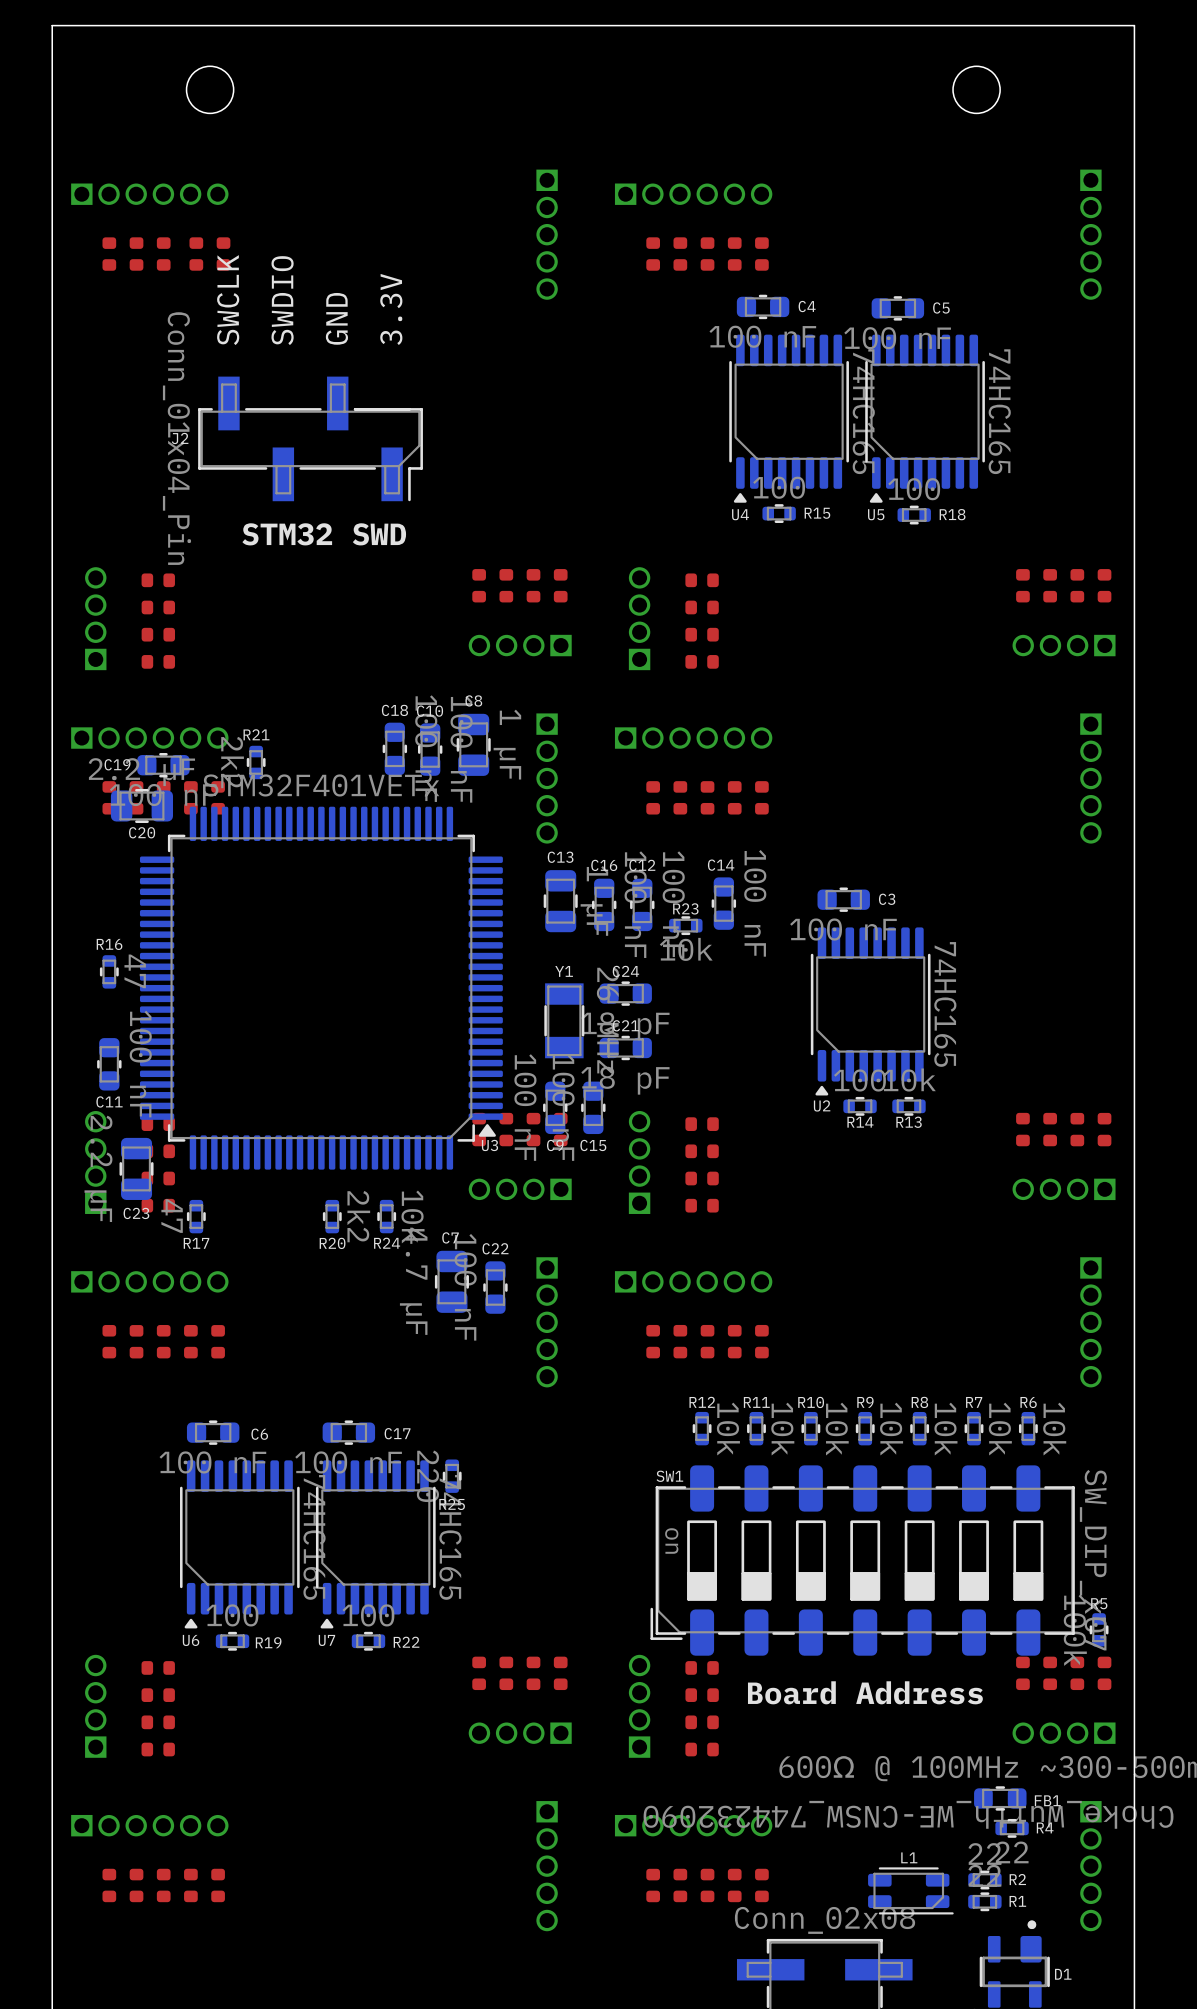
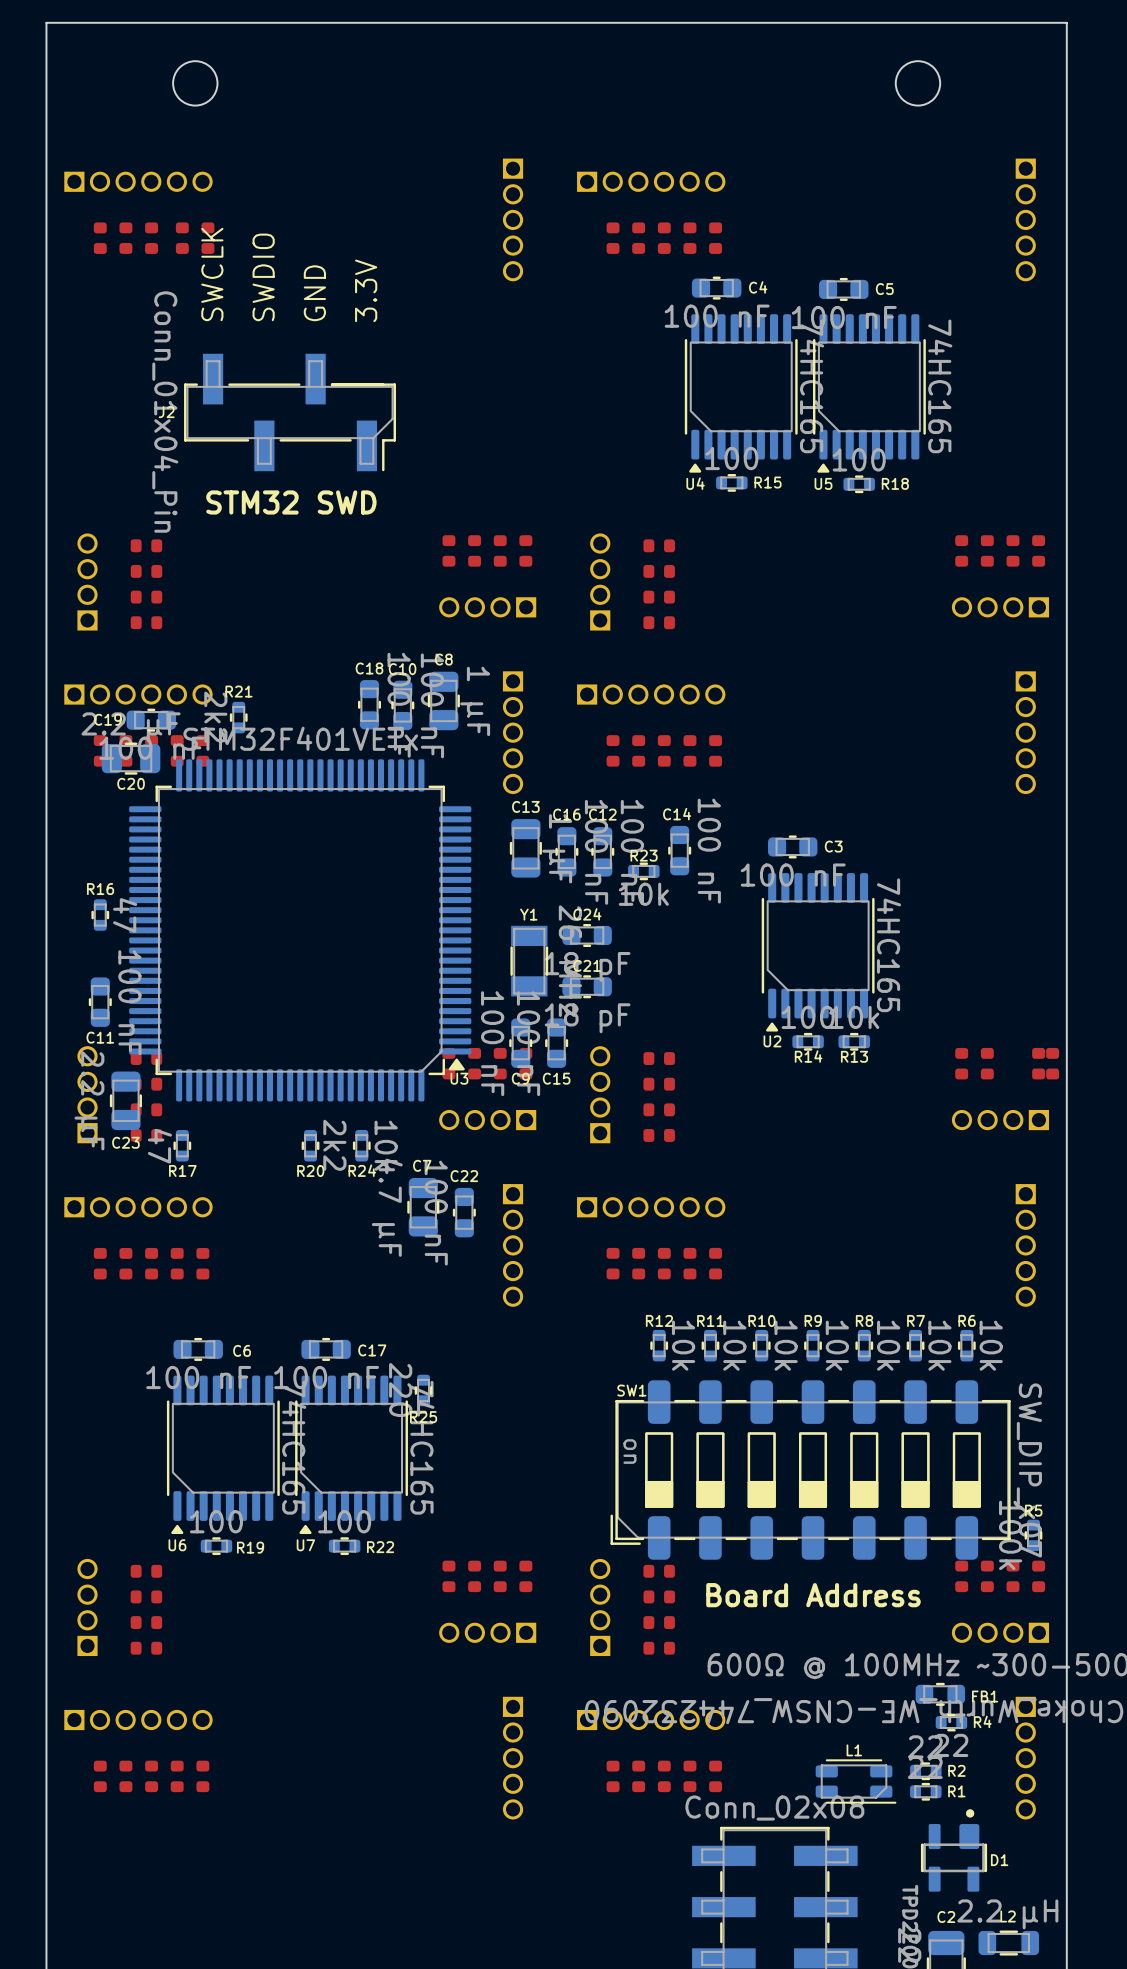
part position: (1077, 1129) -> (1052, 1063)

